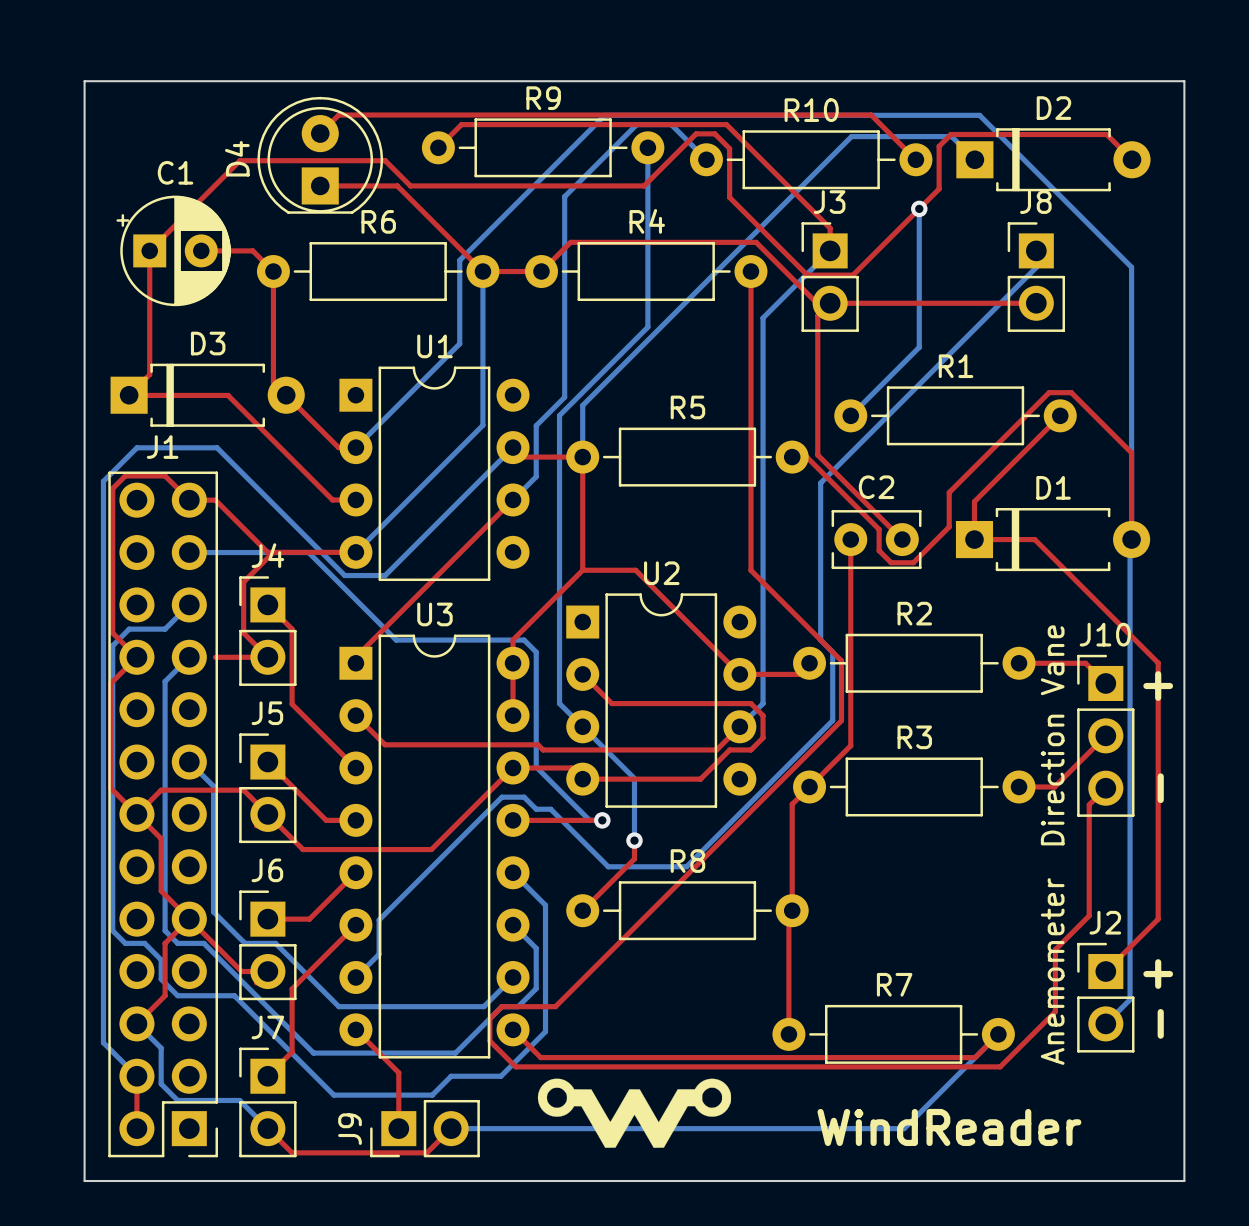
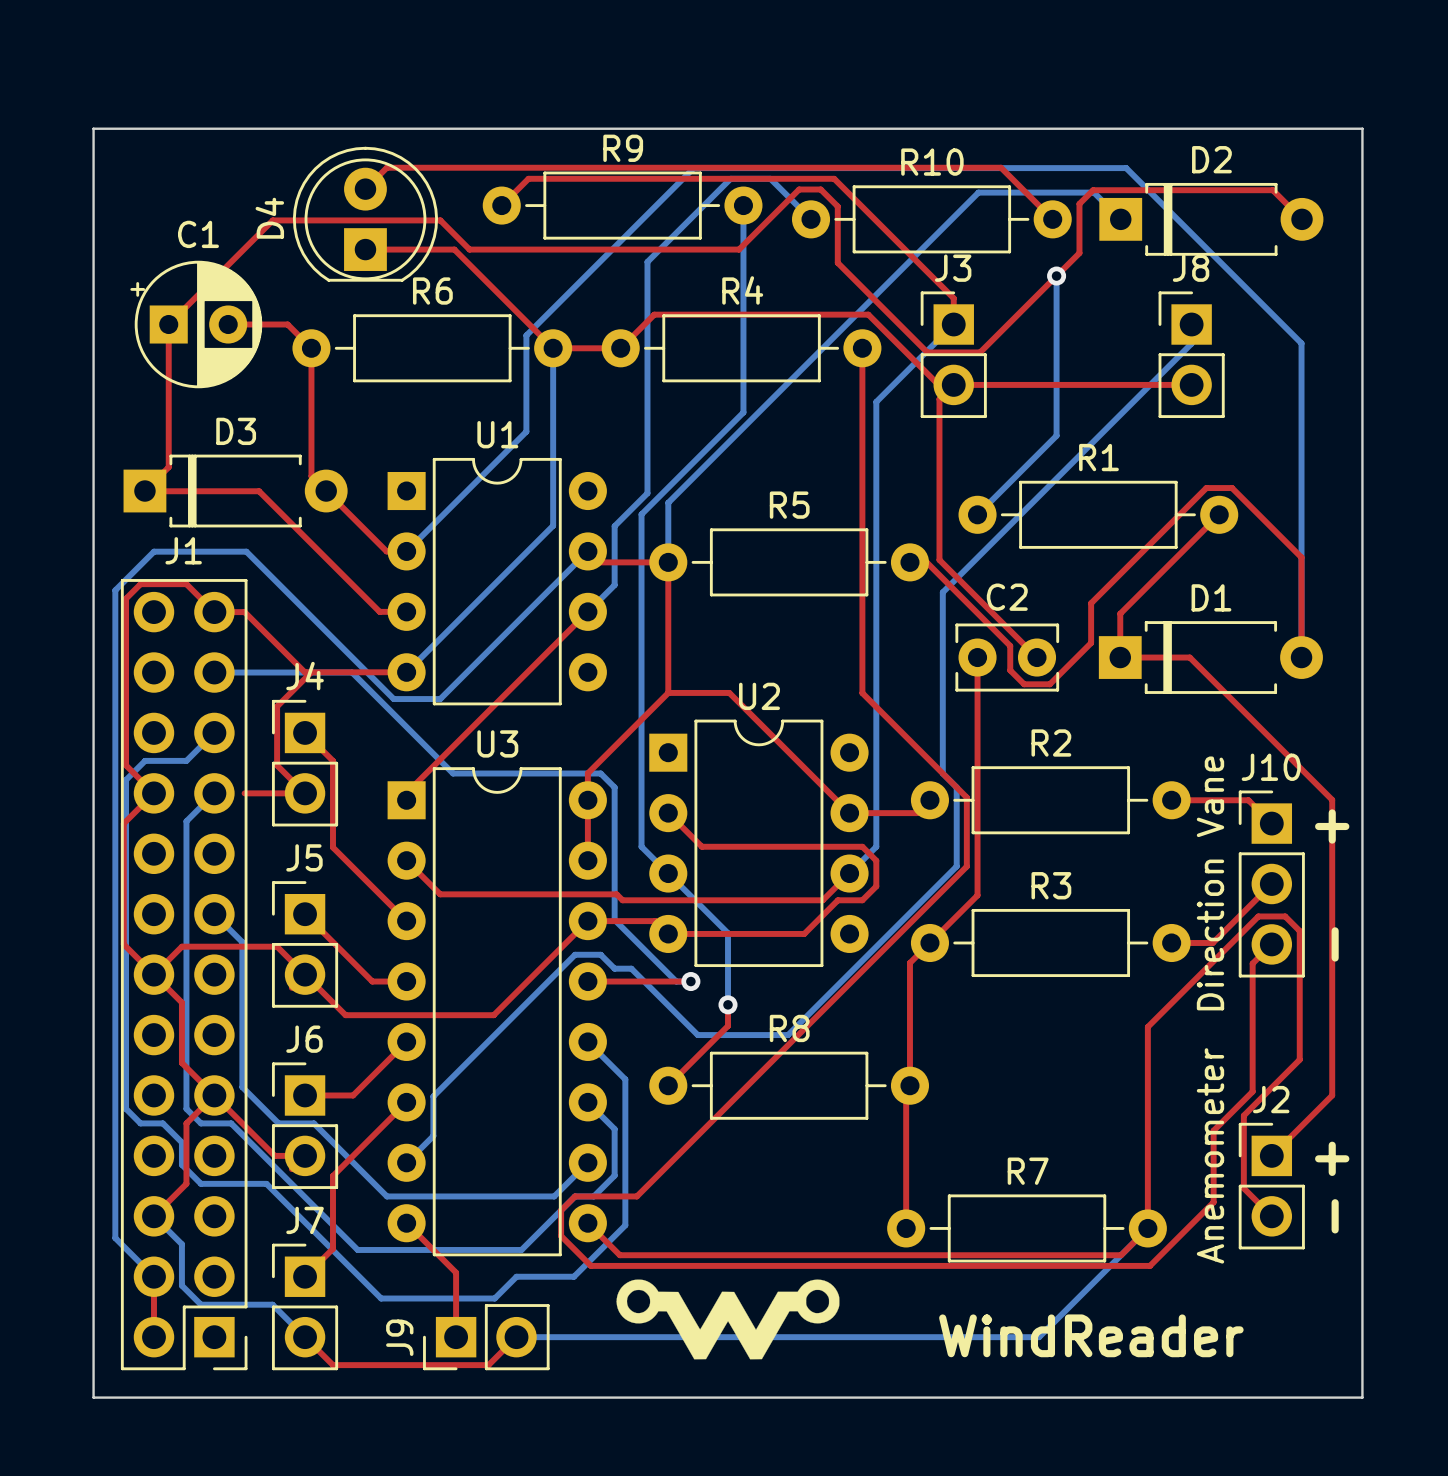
bottom track: (1131, 539) (1130, 541) (1130, 999) (1105, 1023) -> none
top track: none -> (1271, 1216) (1243, 1188) (1243, 1115) (1299, 1059) (1299, 931) (1285, 916) (1258, 916) (1147, 1026) (1147, 1228)

